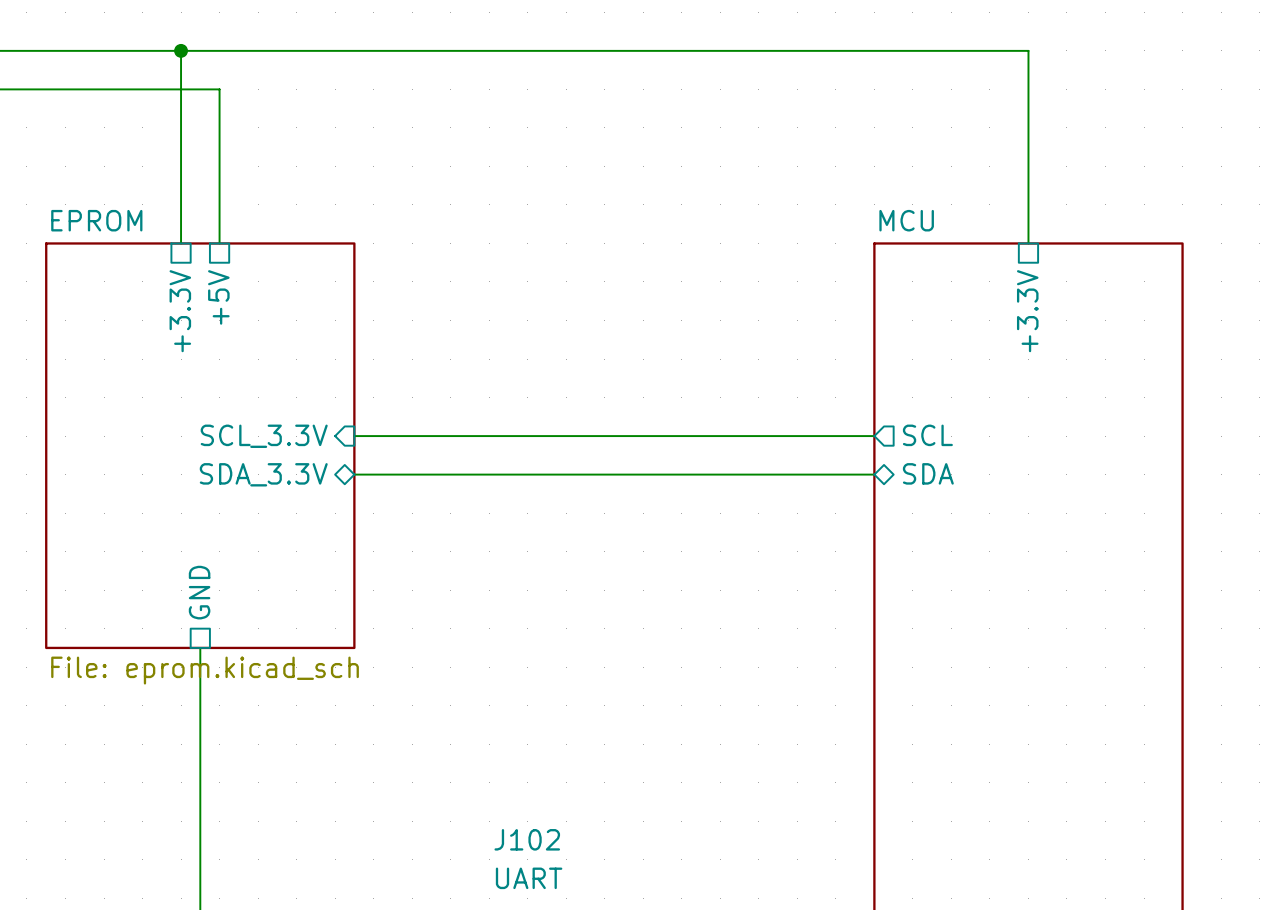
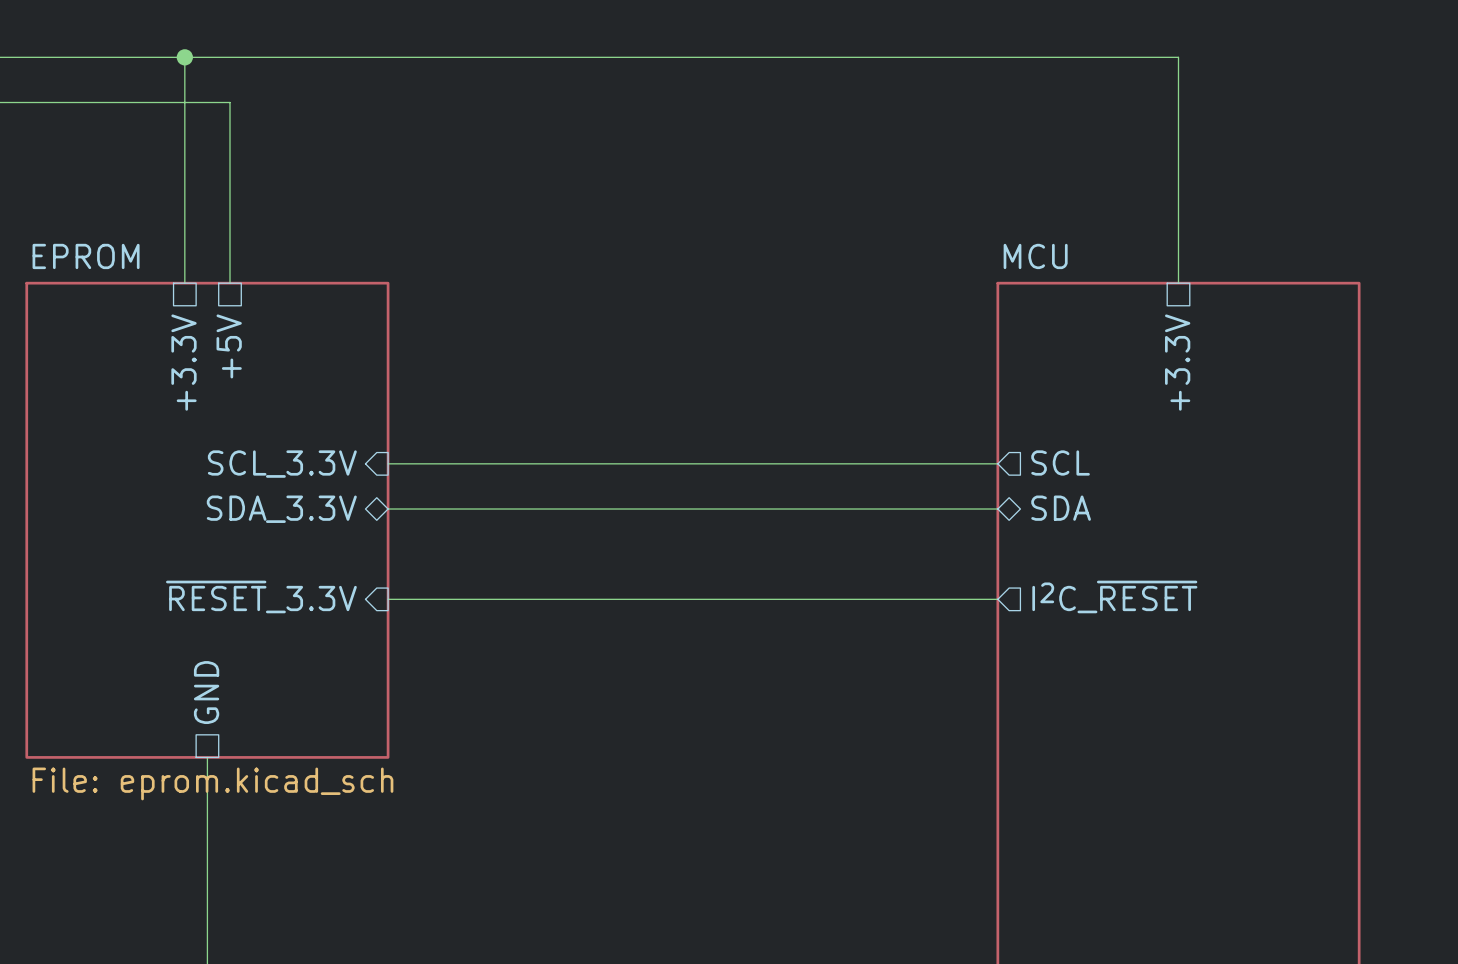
sheet pin: none -> SCL (1060, 462)
sheet pin: none -> SCL_3.3V (282, 464)
wire: none -> (388, 463) (997, 463)
sheet pin shape: output (927, 435) -> bidirectional (1061, 508)
sheet pin: SCL (927, 435) -> SDA (1061, 508)
sheet pin shape: input (264, 436) -> bidirectional (281, 509)
sheet pin: SCL_3.3V (264, 436) -> SDA_3.3V (281, 509)
sheet pin: SDA (928, 473) -> none
sheet pin: SDA_3.3V (263, 474) -> none
wire: (354, 474) (874, 474) -> (388, 599) (997, 599)
sheet pin: none -> ~{RESET}_3.3V (261, 596)
sheet pin: none -> I2C_~{RESET} (1114, 596)

